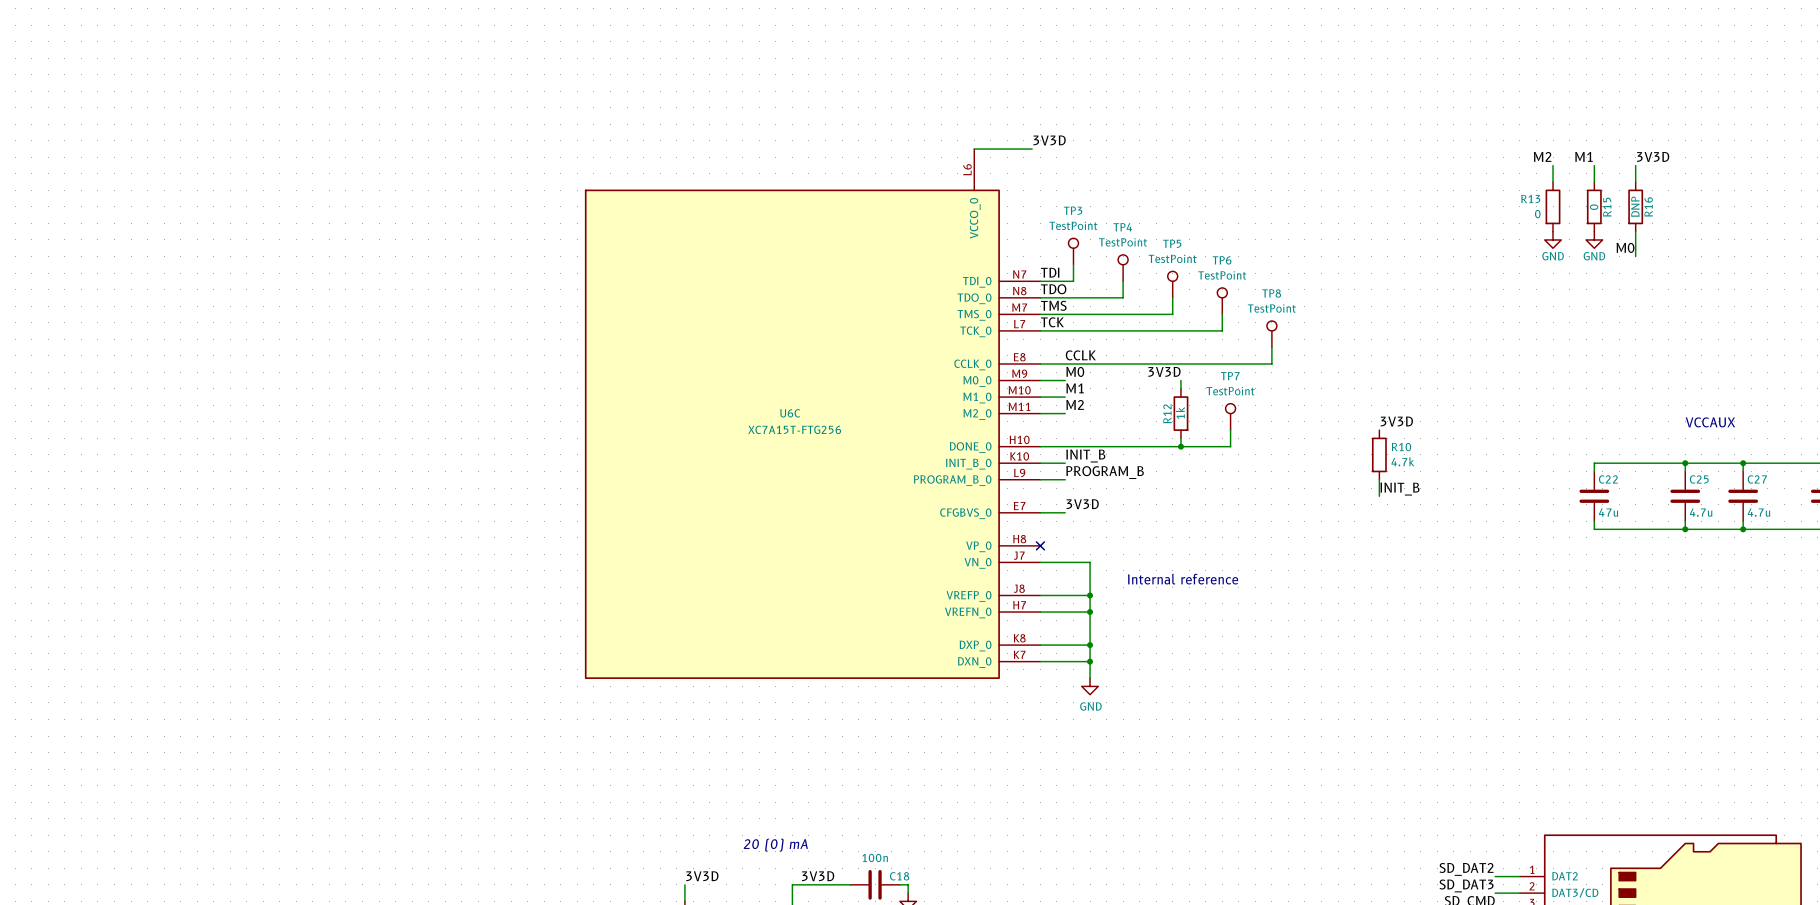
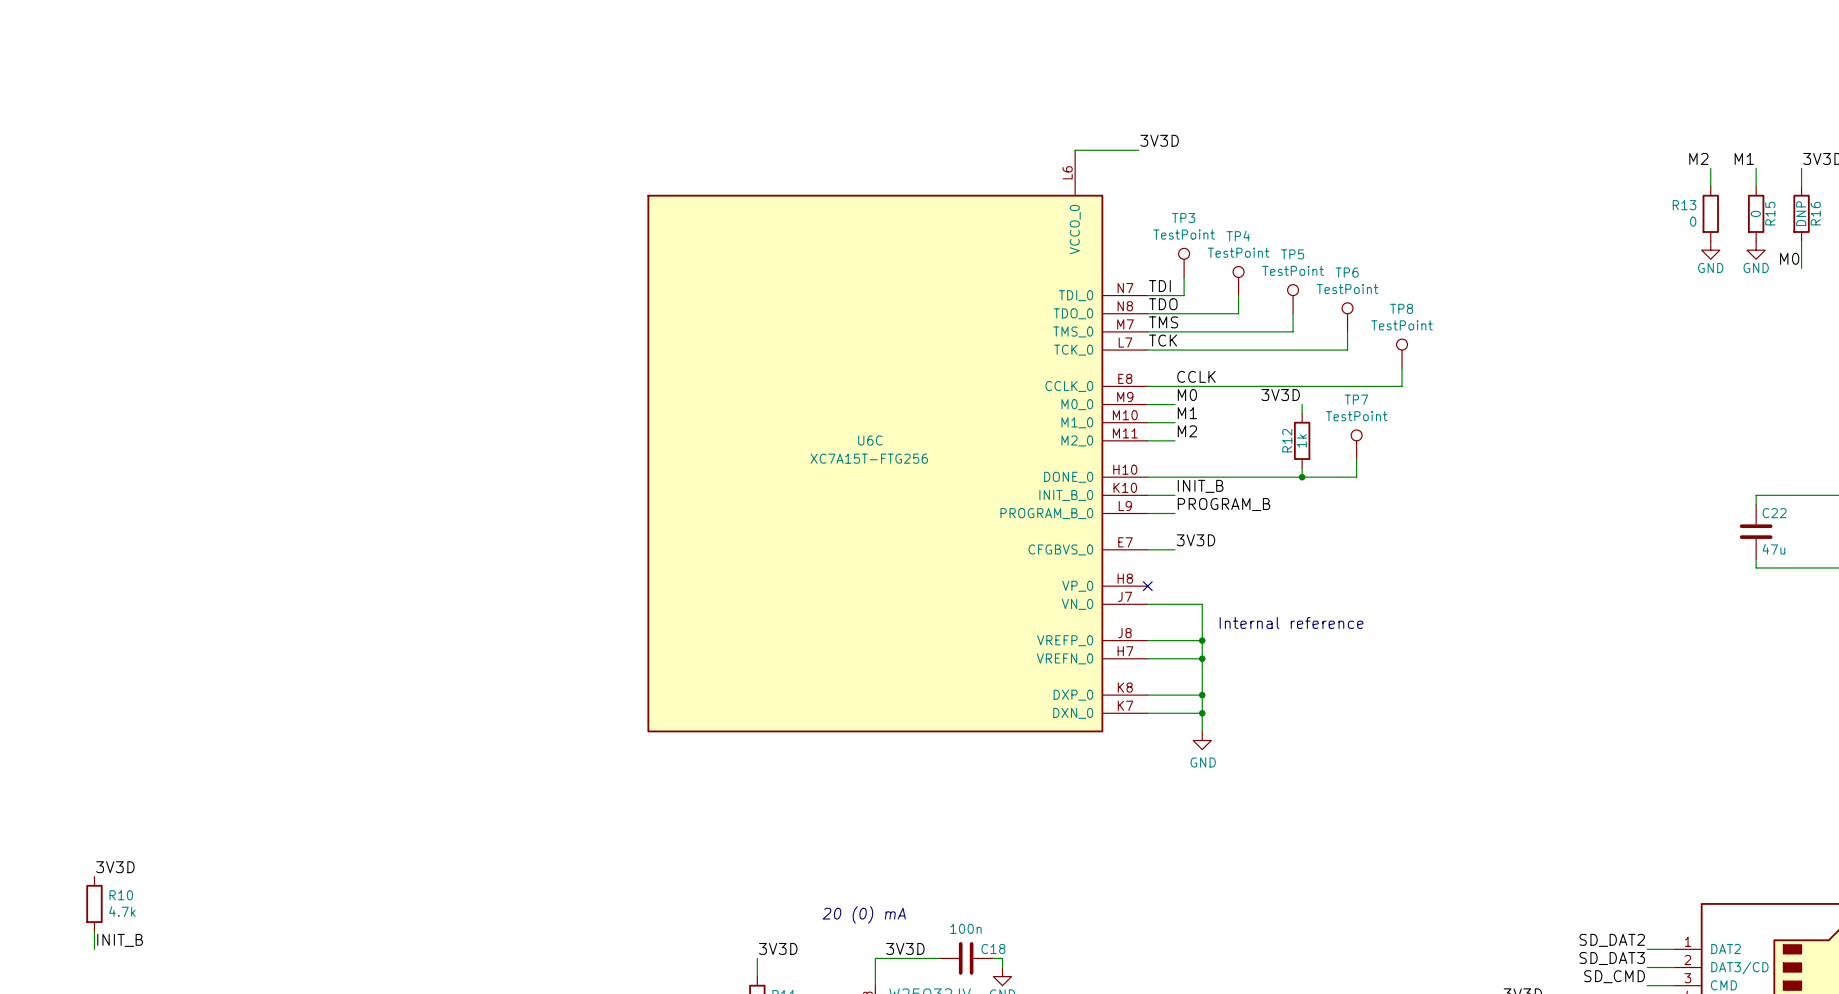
label: 3V3D (1396, 421) -> none
R10 position: (1379, 454) -> (94, 903)
wire: (1379, 479) (1379, 496) -> none
label: INIT_B (1399, 489) -> none
label: none -> 3V3D (115, 867)
wire: none -> (94, 931) (94, 949)
label: none -> INIT_B (120, 940)

